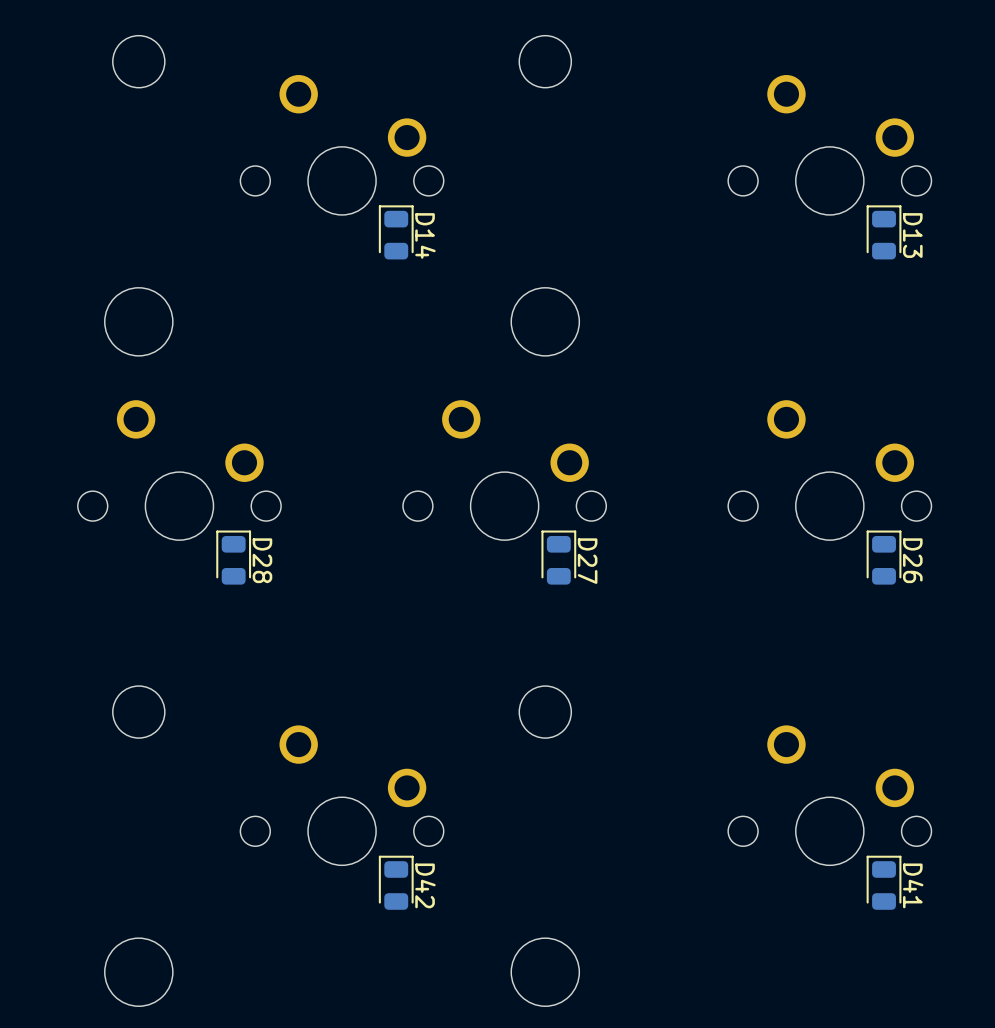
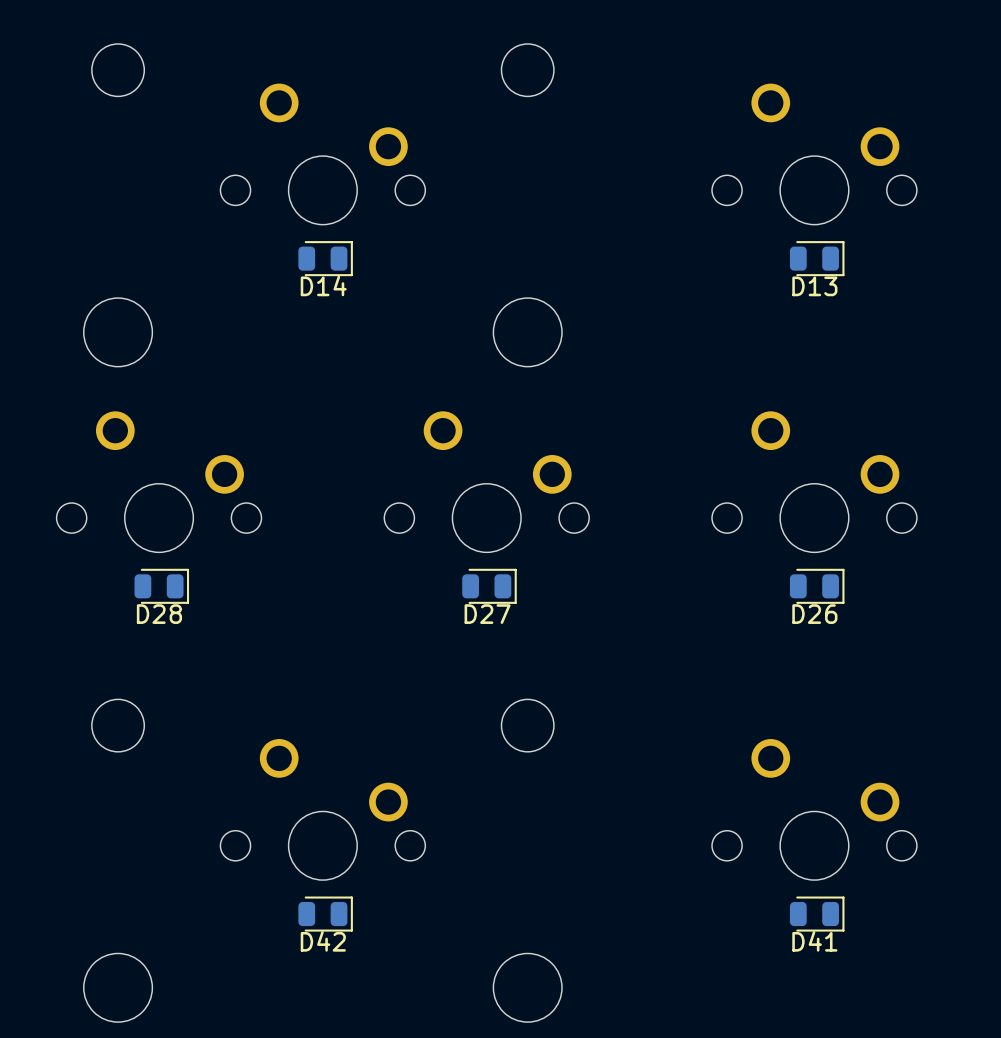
D14 rotation: 0° (396, 232) -> 90° clockwise (325, 258)
D14 position: (396, 232) -> (325, 258)
D13 rotation: 0° (884, 232) -> 90° clockwise (817, 258)
D13 position: (884, 232) -> (817, 258)
D28 rotation: 0° (233, 557) -> 90° clockwise (161, 586)
D28 position: (233, 557) -> (161, 586)
D27 rotation: 0° (558, 557) -> 90° clockwise (489, 586)
D27 position: (558, 557) -> (489, 586)
D26 rotation: 0° (884, 557) -> 90° clockwise (817, 586)
D26 position: (884, 557) -> (817, 586)
D42 rotation: 0° (396, 882) -> 90° clockwise (325, 914)
D42 position: (396, 882) -> (325, 914)
D41 rotation: 0° (884, 882) -> 90° clockwise (817, 914)
D41 position: (884, 882) -> (817, 914)

